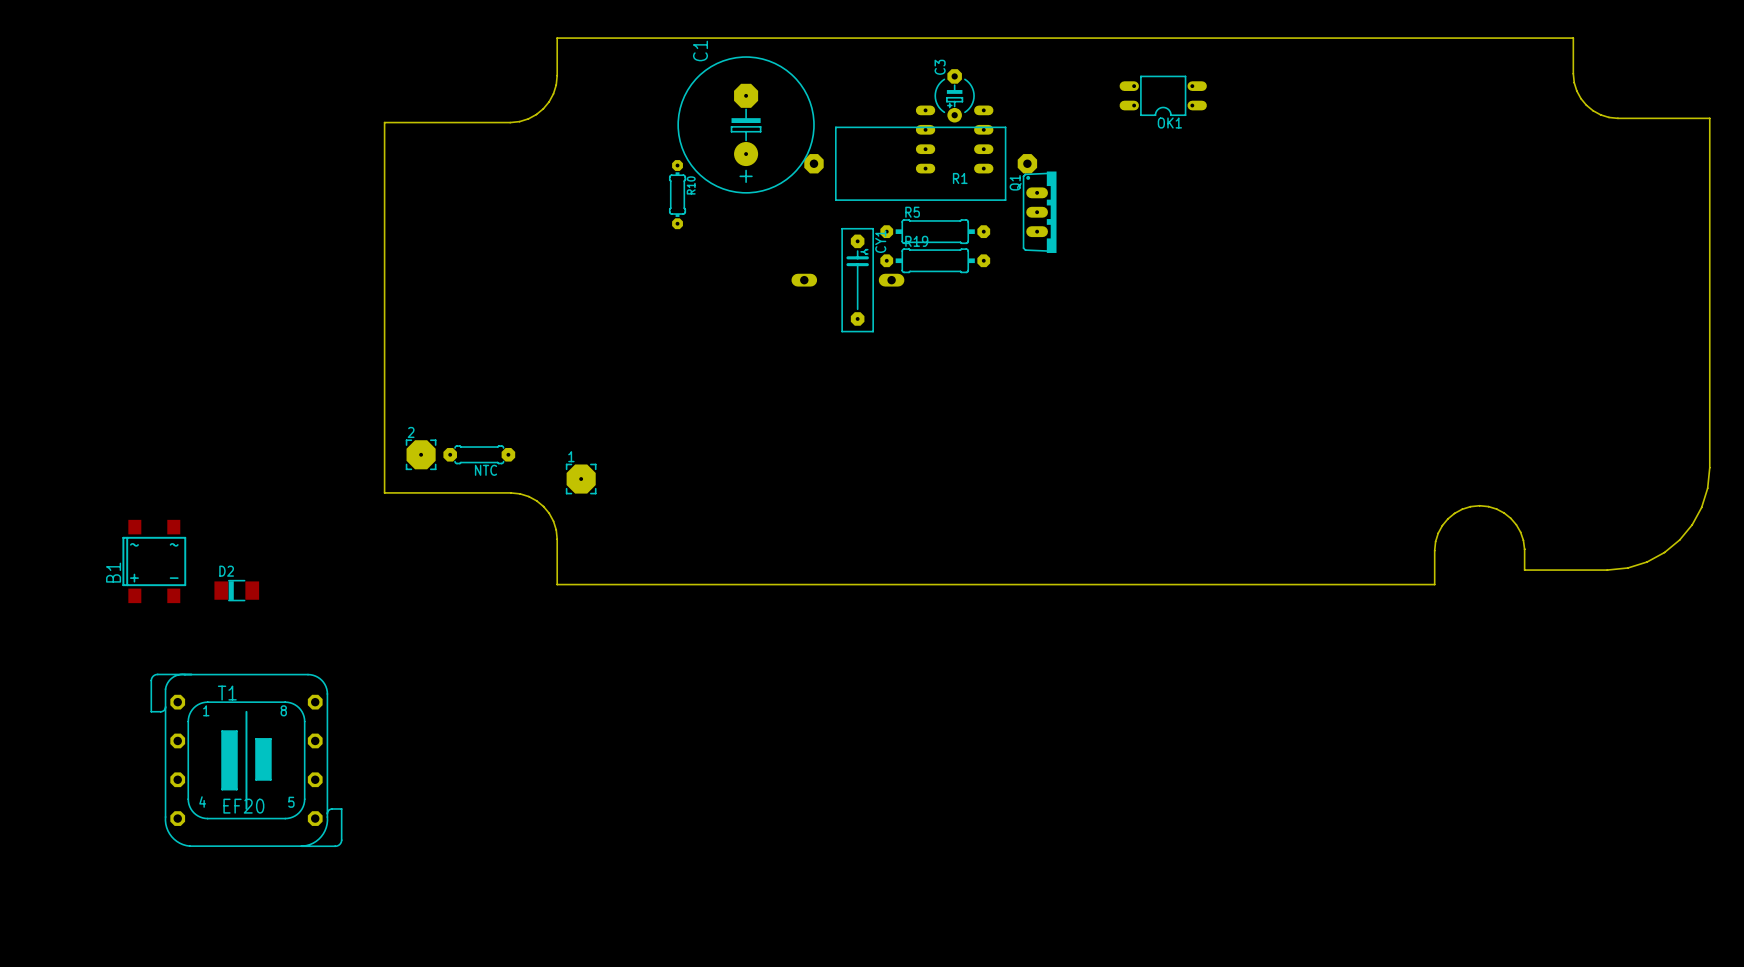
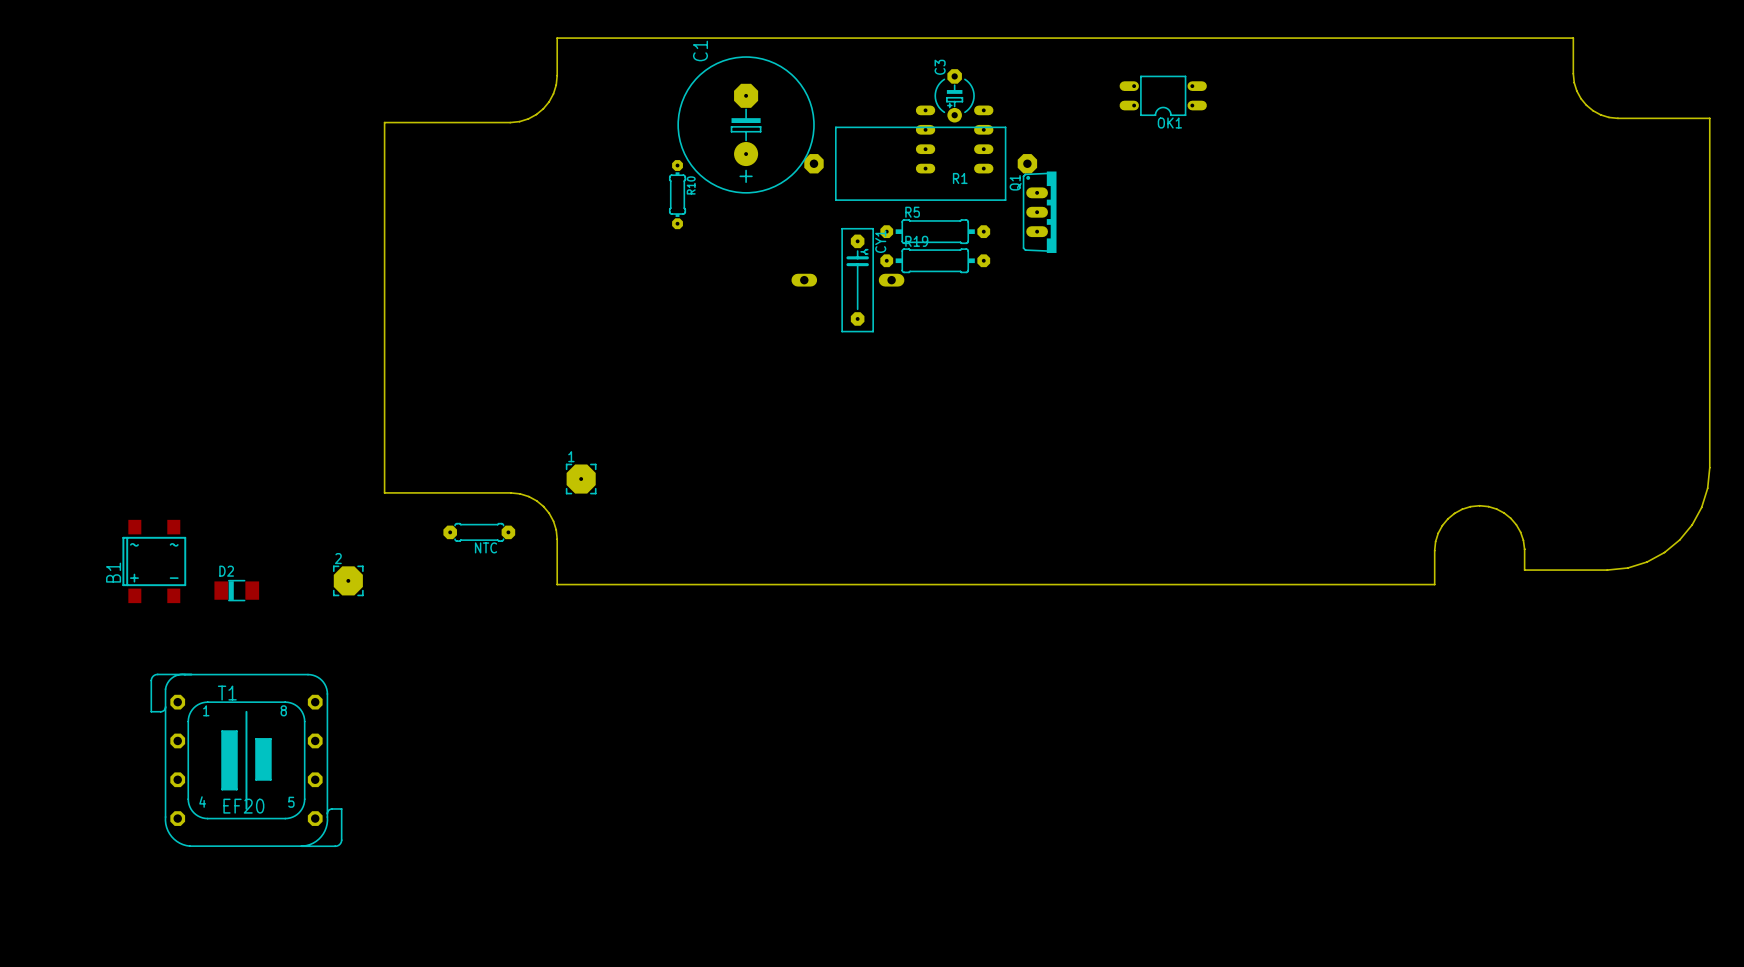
2 position: (421, 454) -> (348, 580)
NTC position: (479, 454) -> (479, 532)

